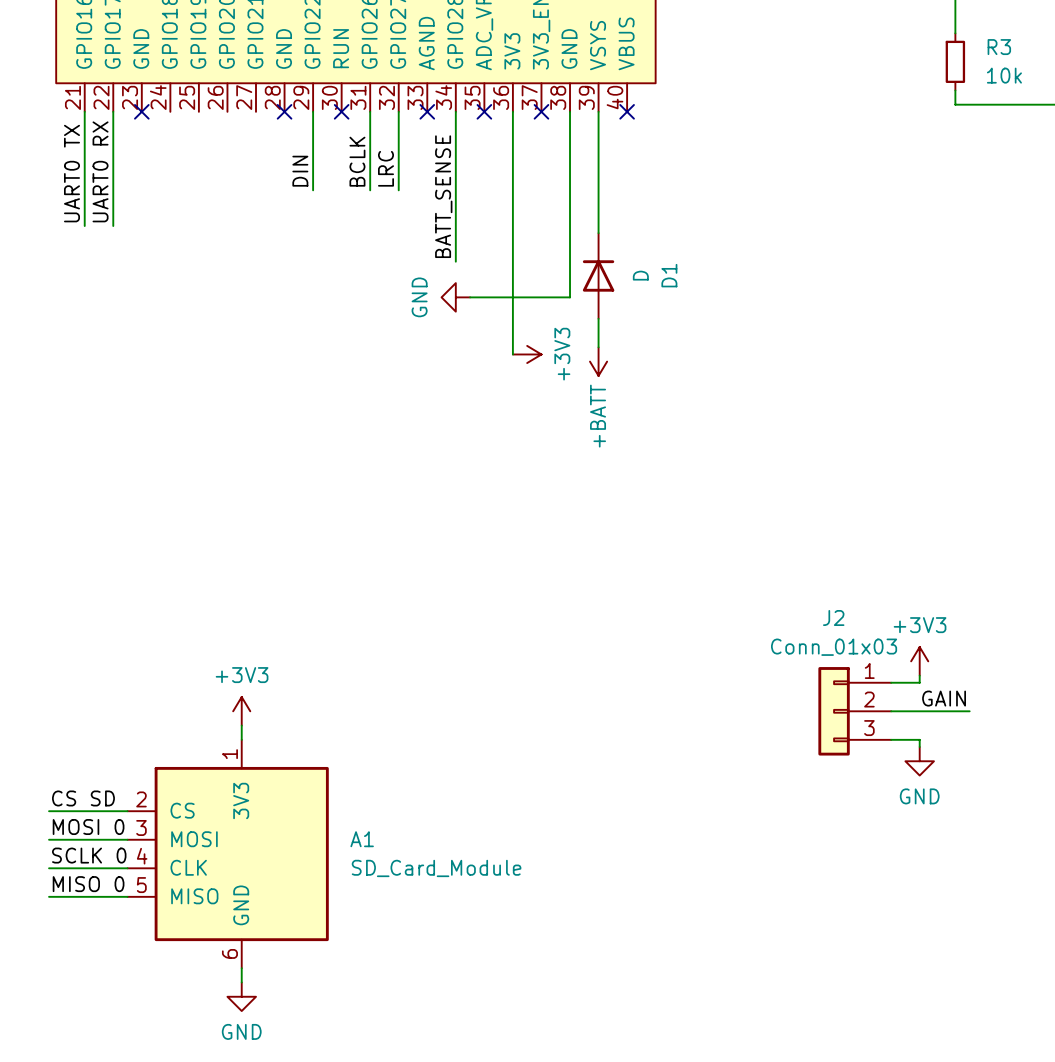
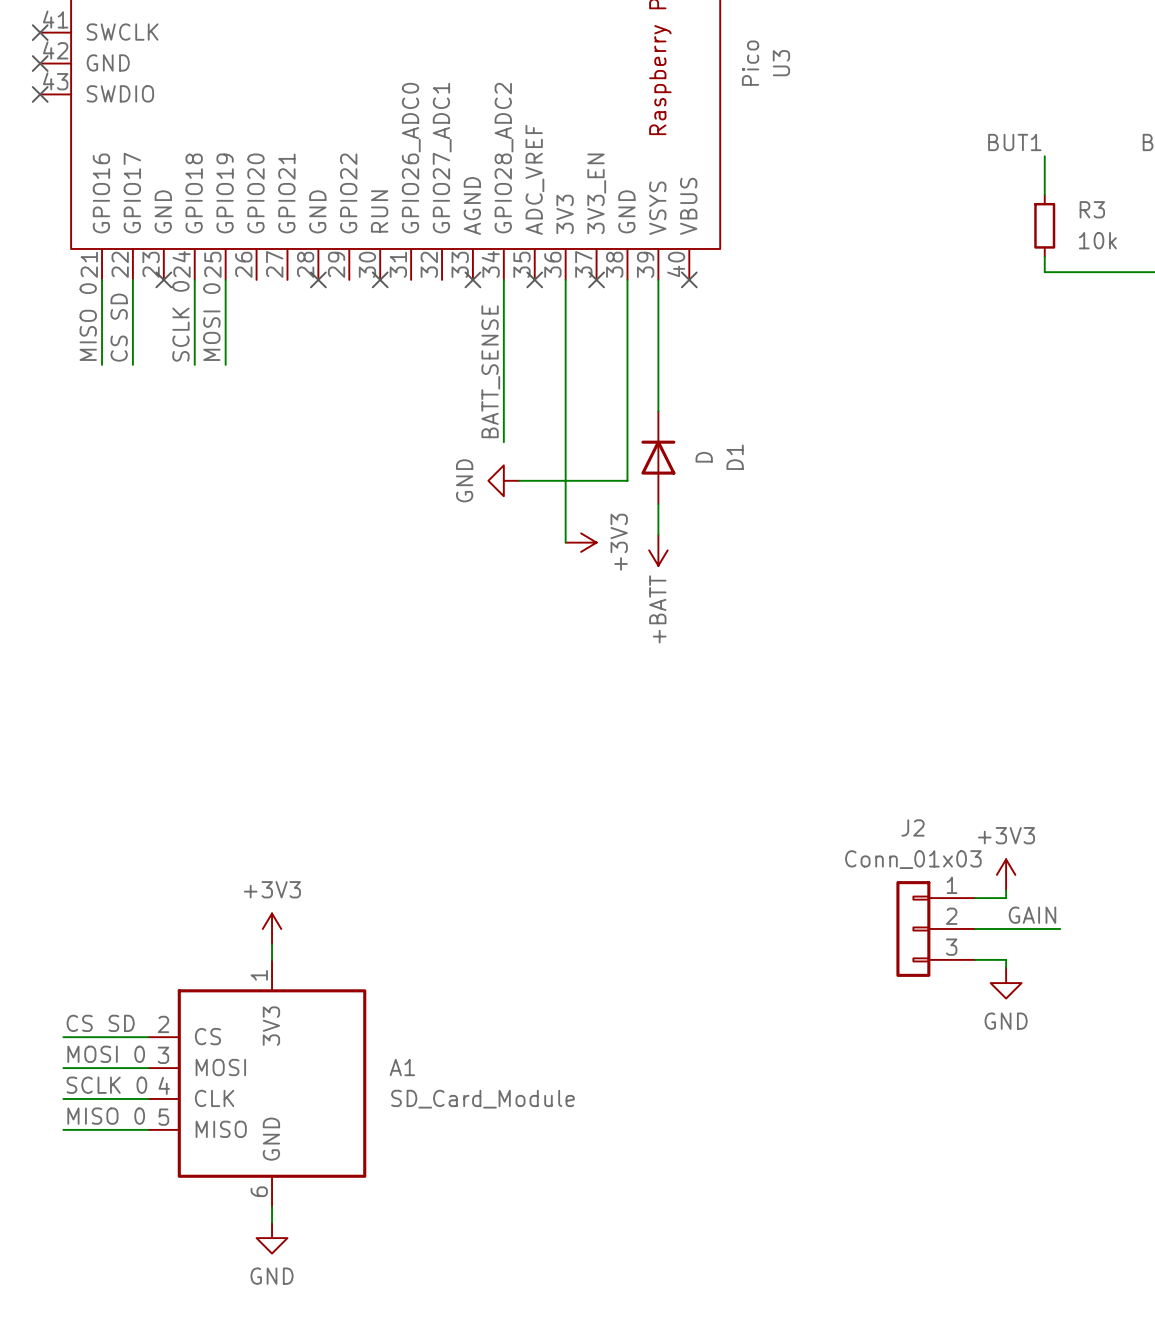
wire: (313, 111) (313, 190) -> none
wire: (370, 111) (370, 190) -> (194, 279) (194, 364)
wire: (398, 111) (398, 190) -> (225, 279) (225, 364)
label: none -> MISO 0 (88, 322)
label: none -> SCLK 0 (180, 321)
label: none -> MOSI 0 (211, 322)
label: none -> CS SD (119, 327)
label: BCLK (357, 161) -> none
label: LRC (385, 168) -> none
label: UART0 RX (100, 171) -> none
label: DIN (300, 171) -> none
label: UART0 TX (71, 173) -> none
wire: (84, 190) (84, 226) -> none
wire: (113, 190) (113, 226) -> none

